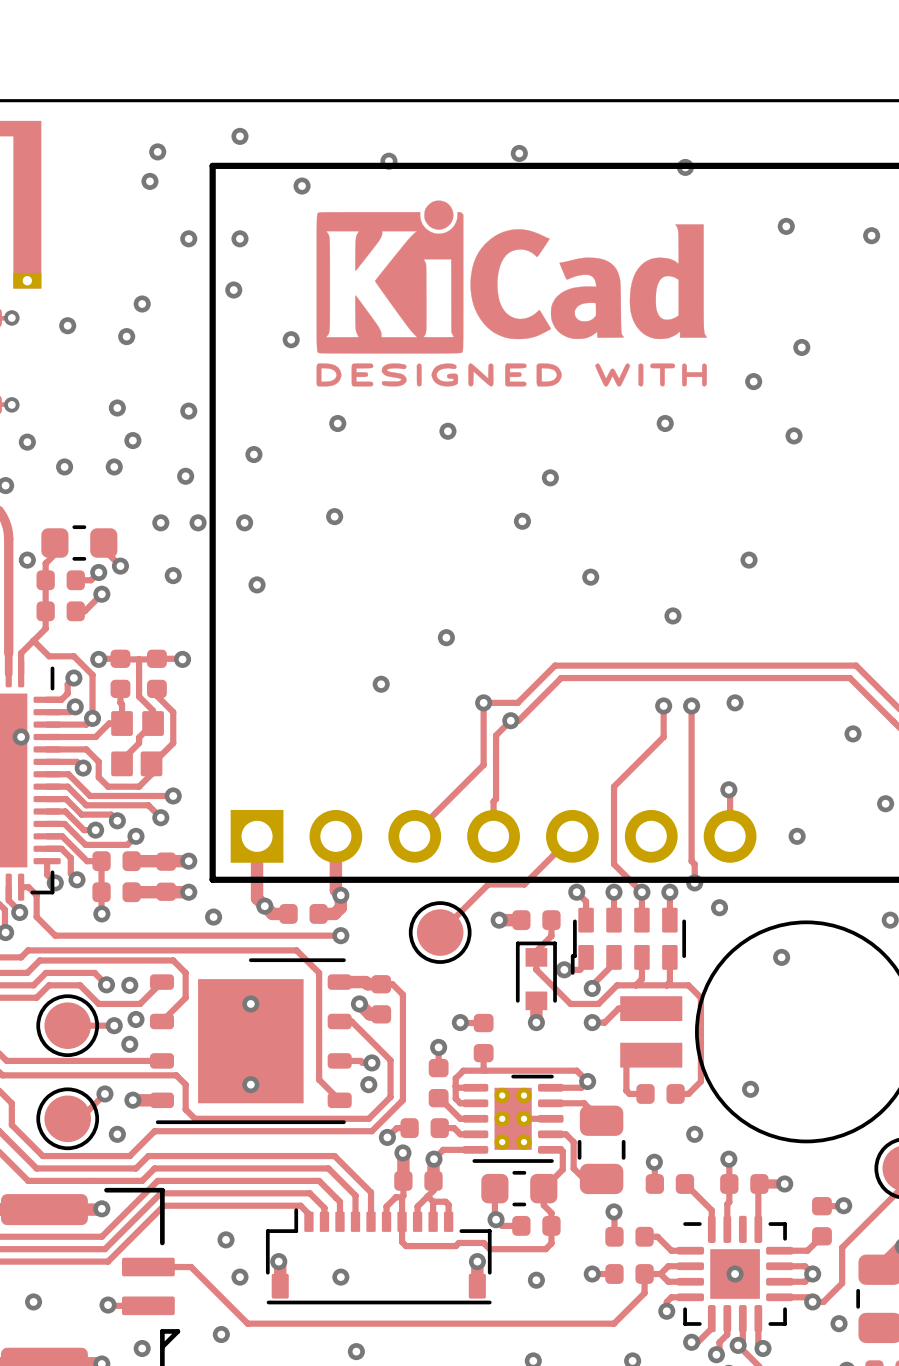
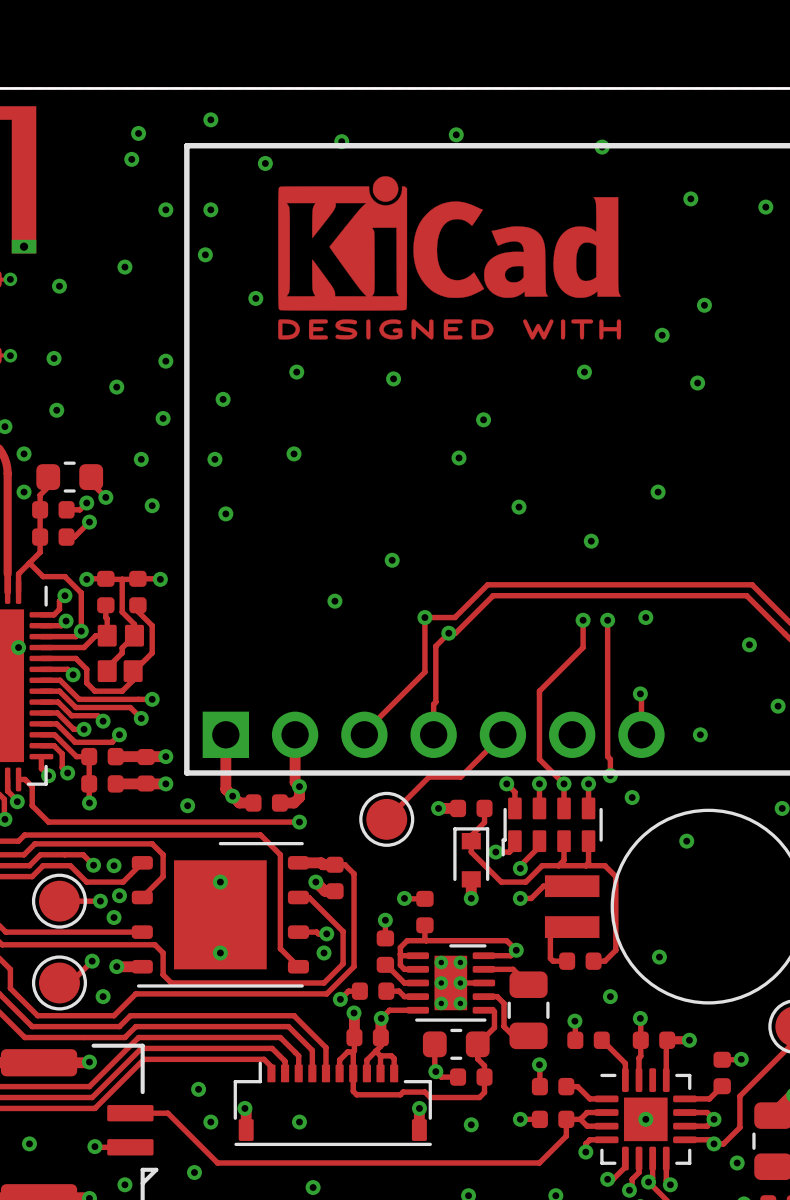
via: (126, 336) -> none
via: none -> (54, 358)
via: (117, 407) -> none
via: (27, 442) -> none
via: (114, 466) -> none
via: none -> (24, 453)
via: (198, 522) -> none

